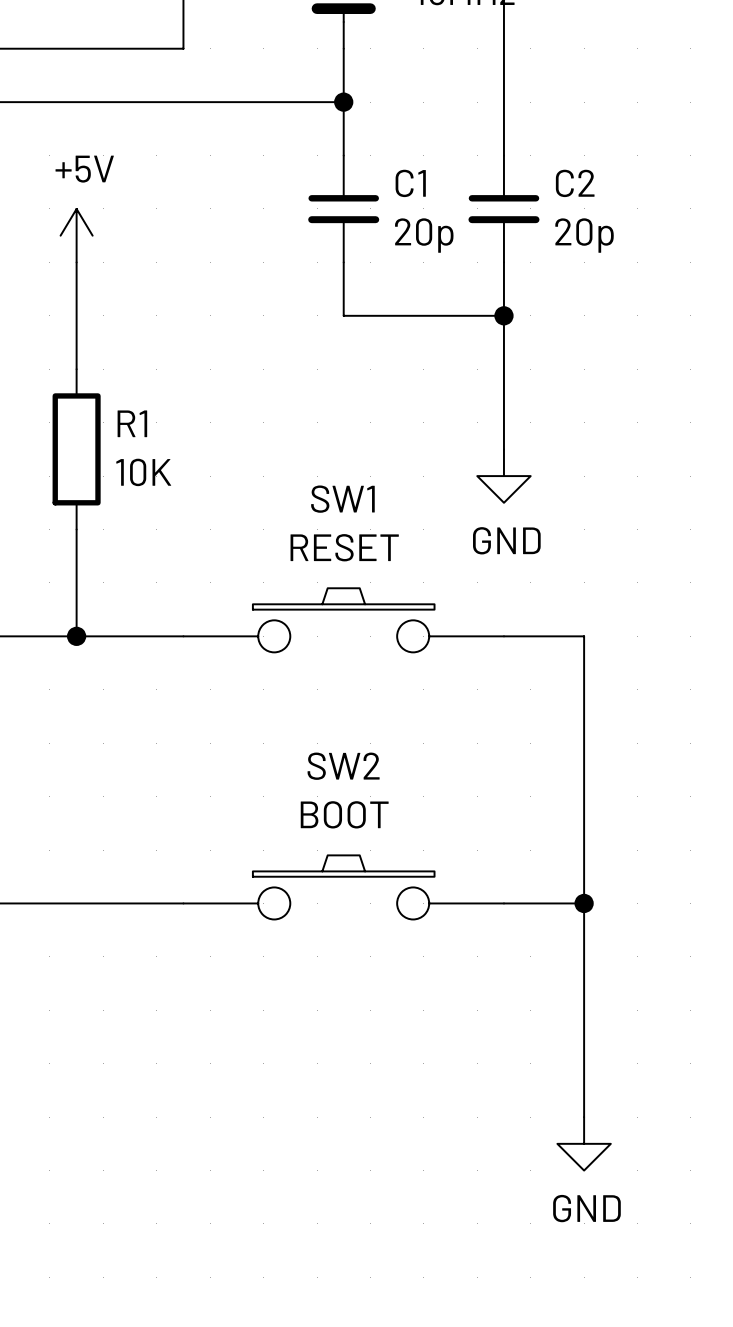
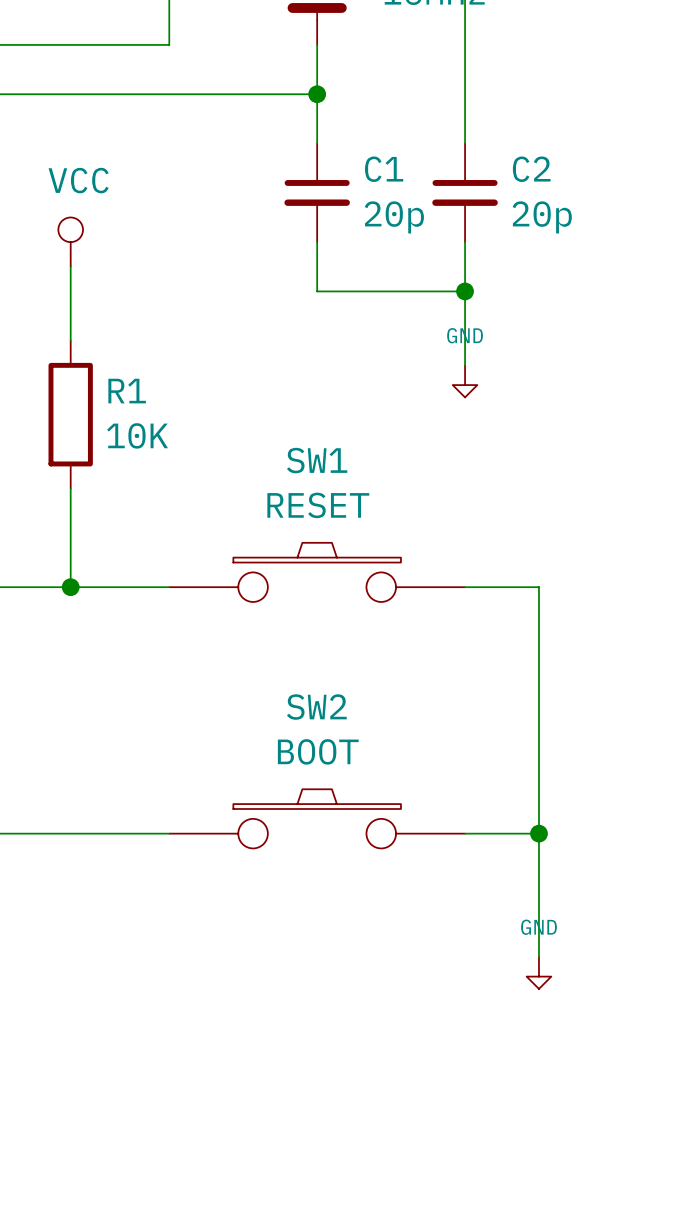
power symbol: +5V (76, 235) -> none
power symbol: none -> VCC (70, 242)
wire: (503, 395) (503, 449) -> none
power symbol: none -> GND (465, 381)
power symbol: GND (503, 476) -> none
wire: (584, 1037) (584, 1117) -> none
power symbol: none -> GND (538, 972)
power symbol: GND (584, 1143) -> none

